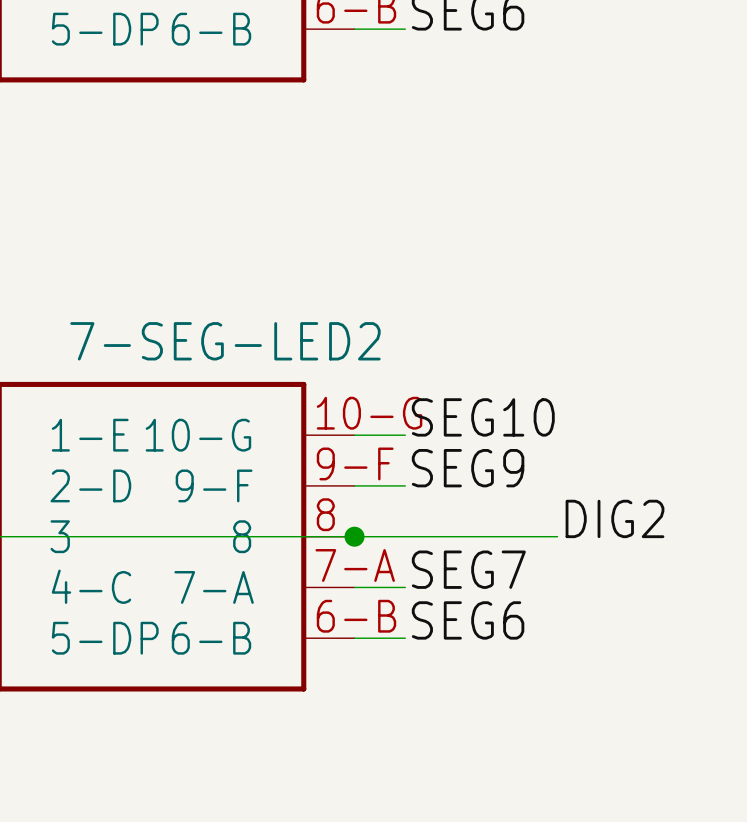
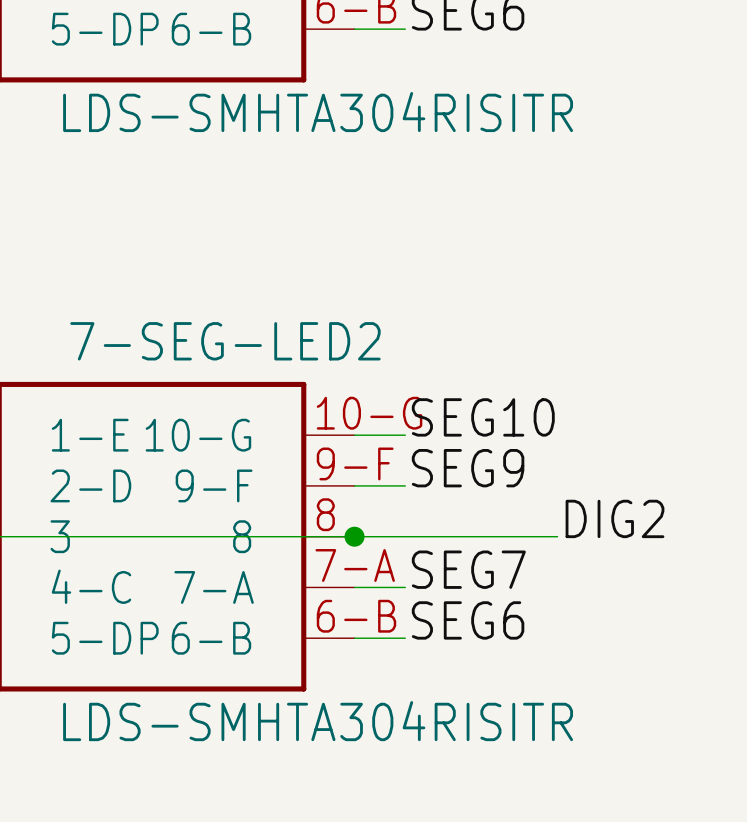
part value: none -> LDS-SMHTA304RISITR (318, 112)
7-SEG-LED2 value: none -> LDS-SMHTA304RISITR (318, 721)

